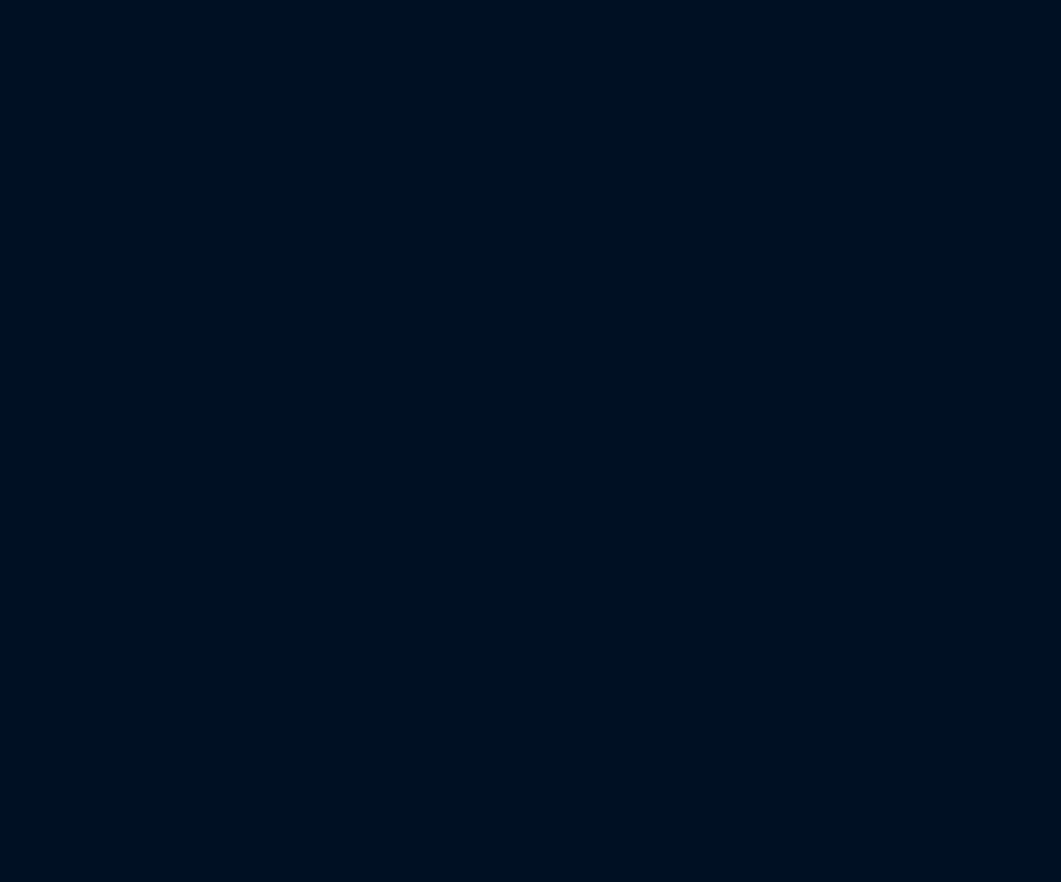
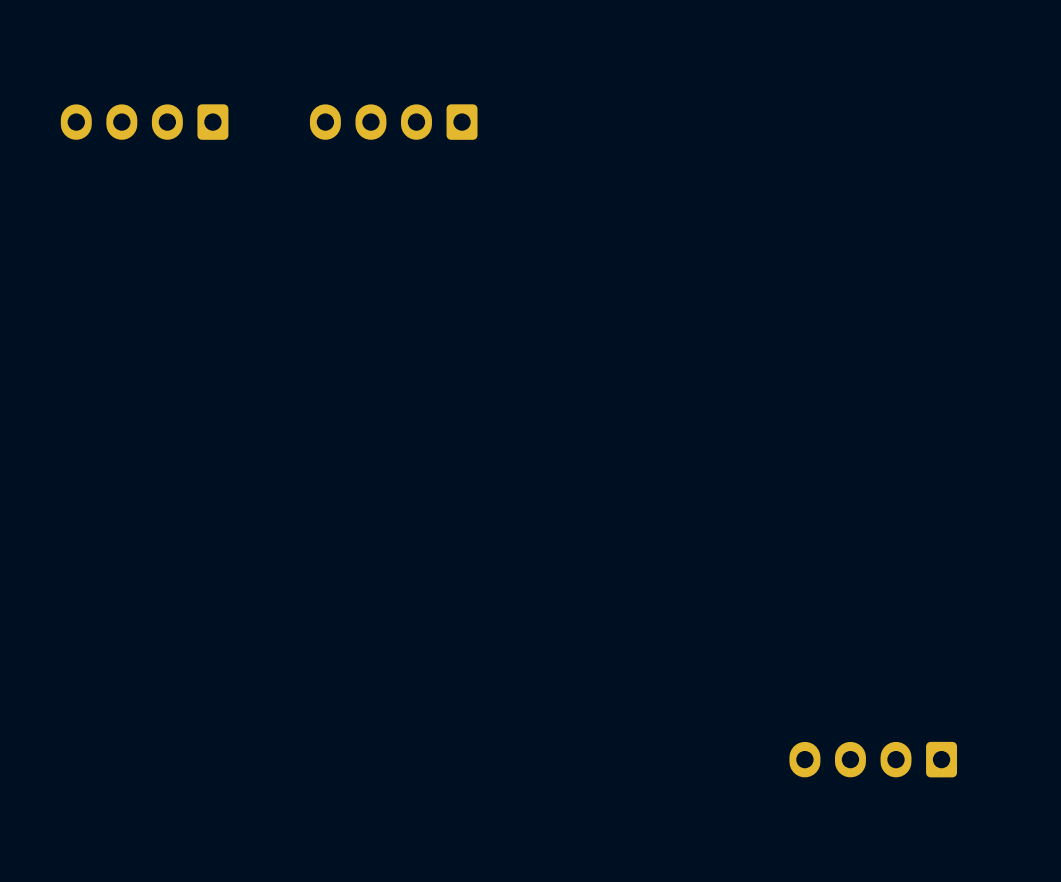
part: none -> (144, 122)
part: none -> (393, 122)
part: none -> (873, 759)

